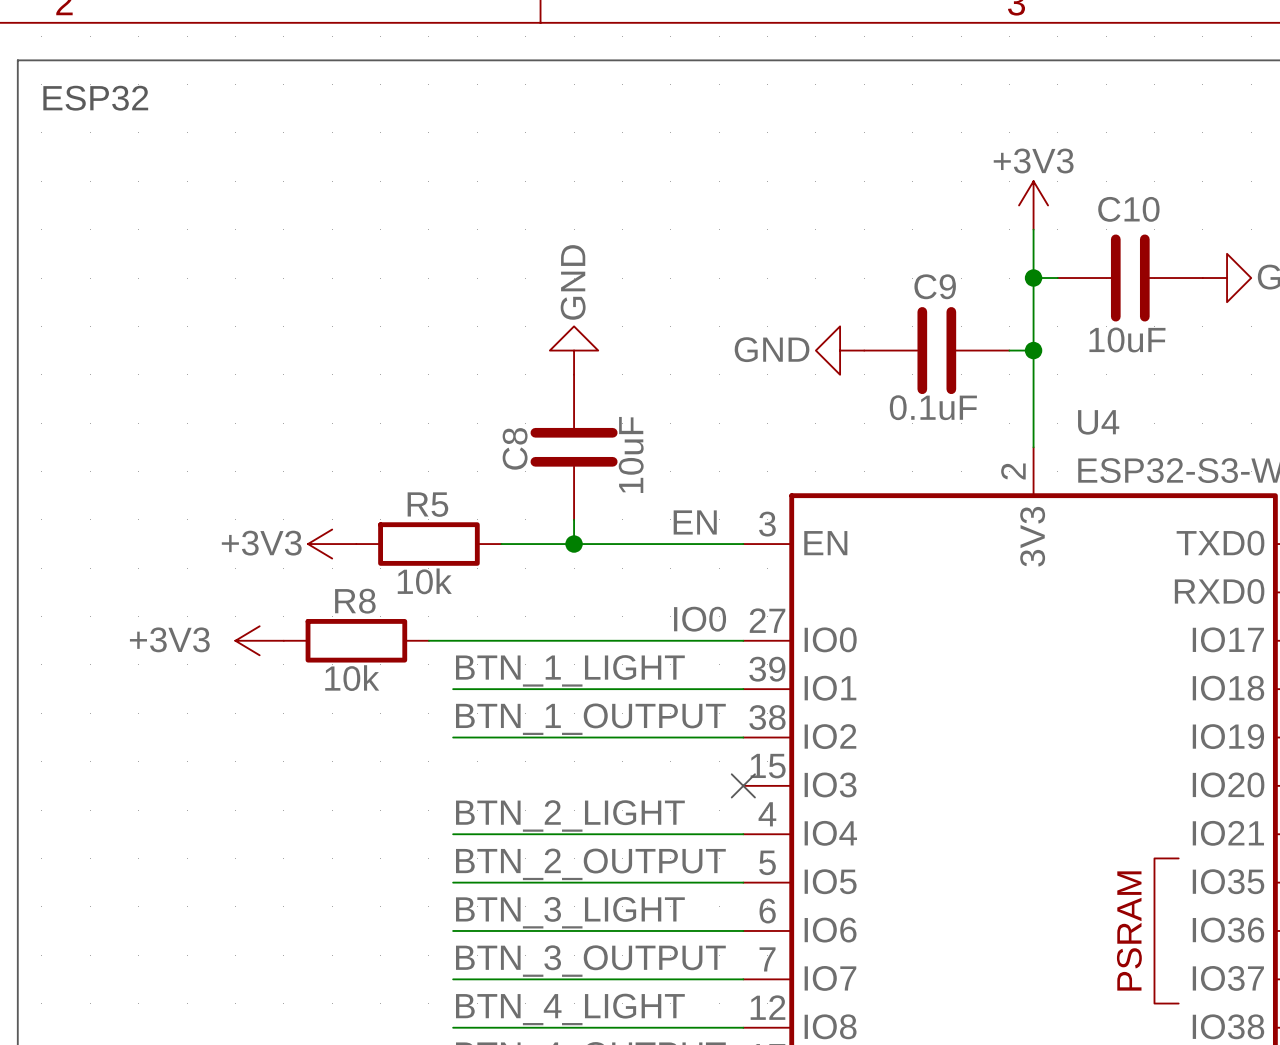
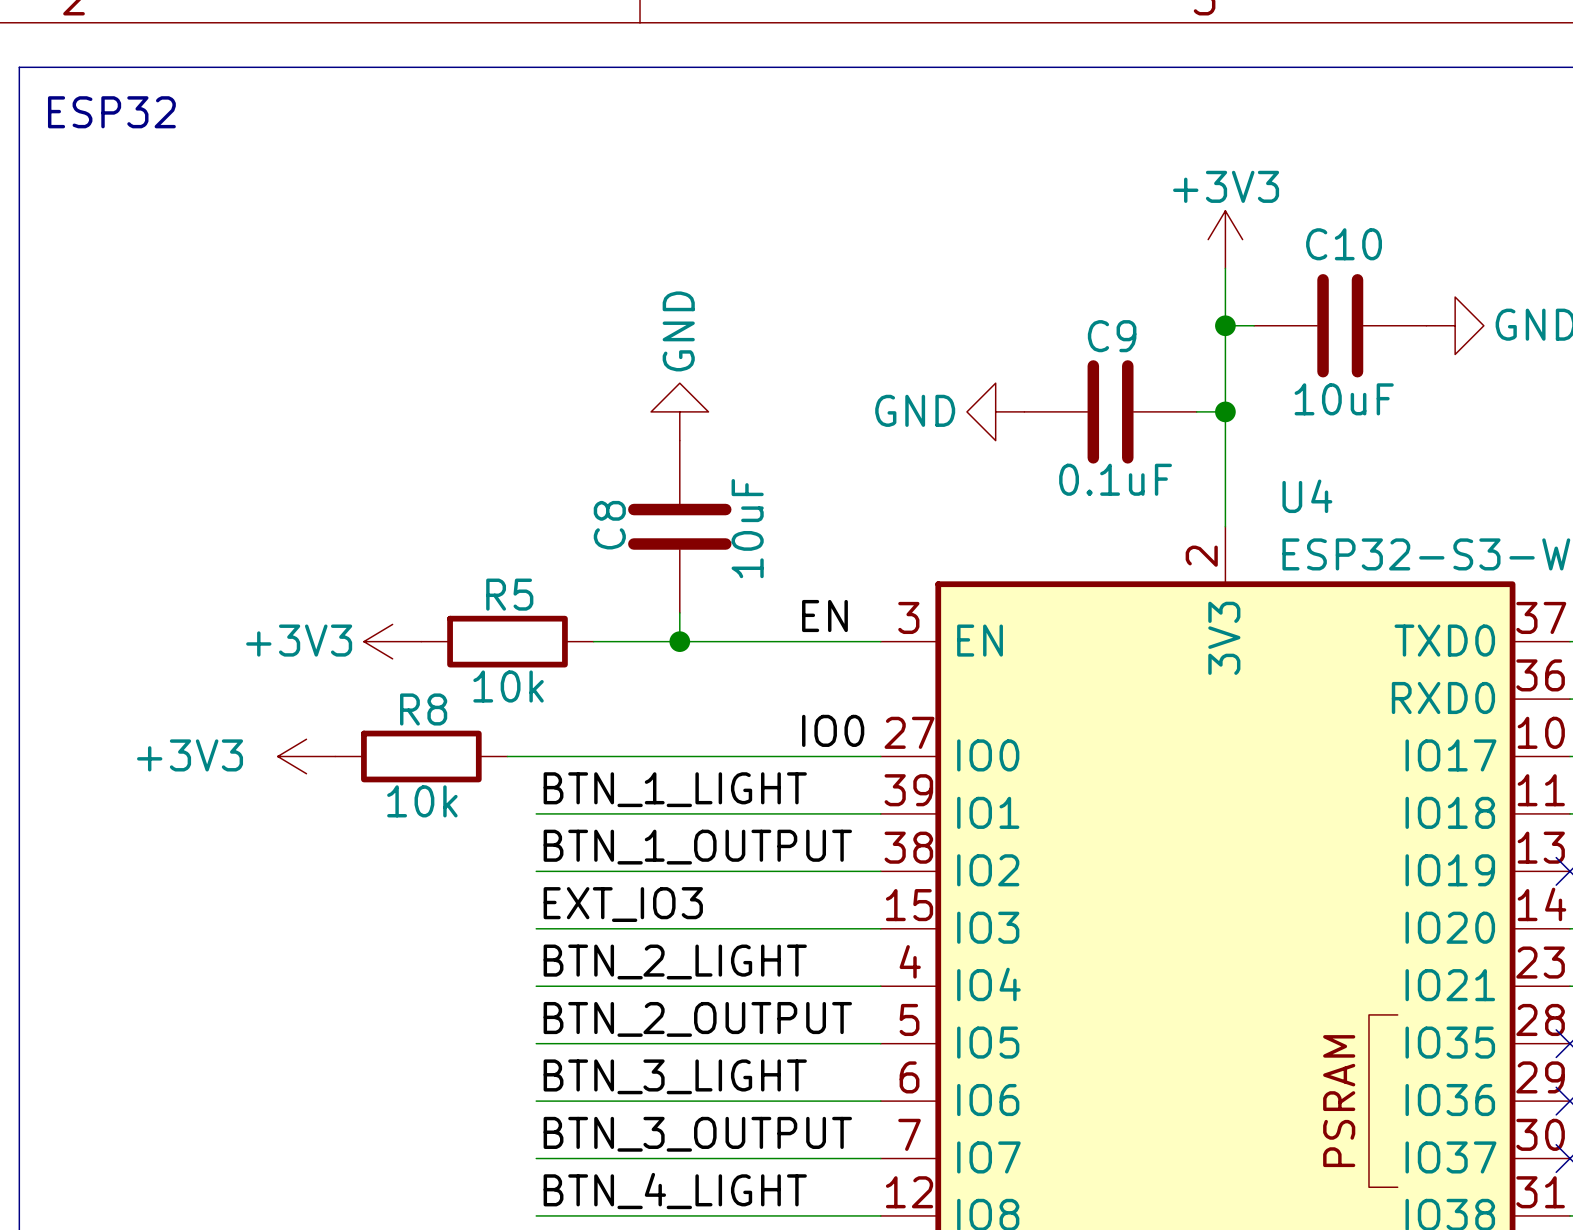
label: none -> EXT_IO3 (623, 904)
wire: none -> (536, 928) (880, 928)
no-connect mark: (743, 785) -> none

